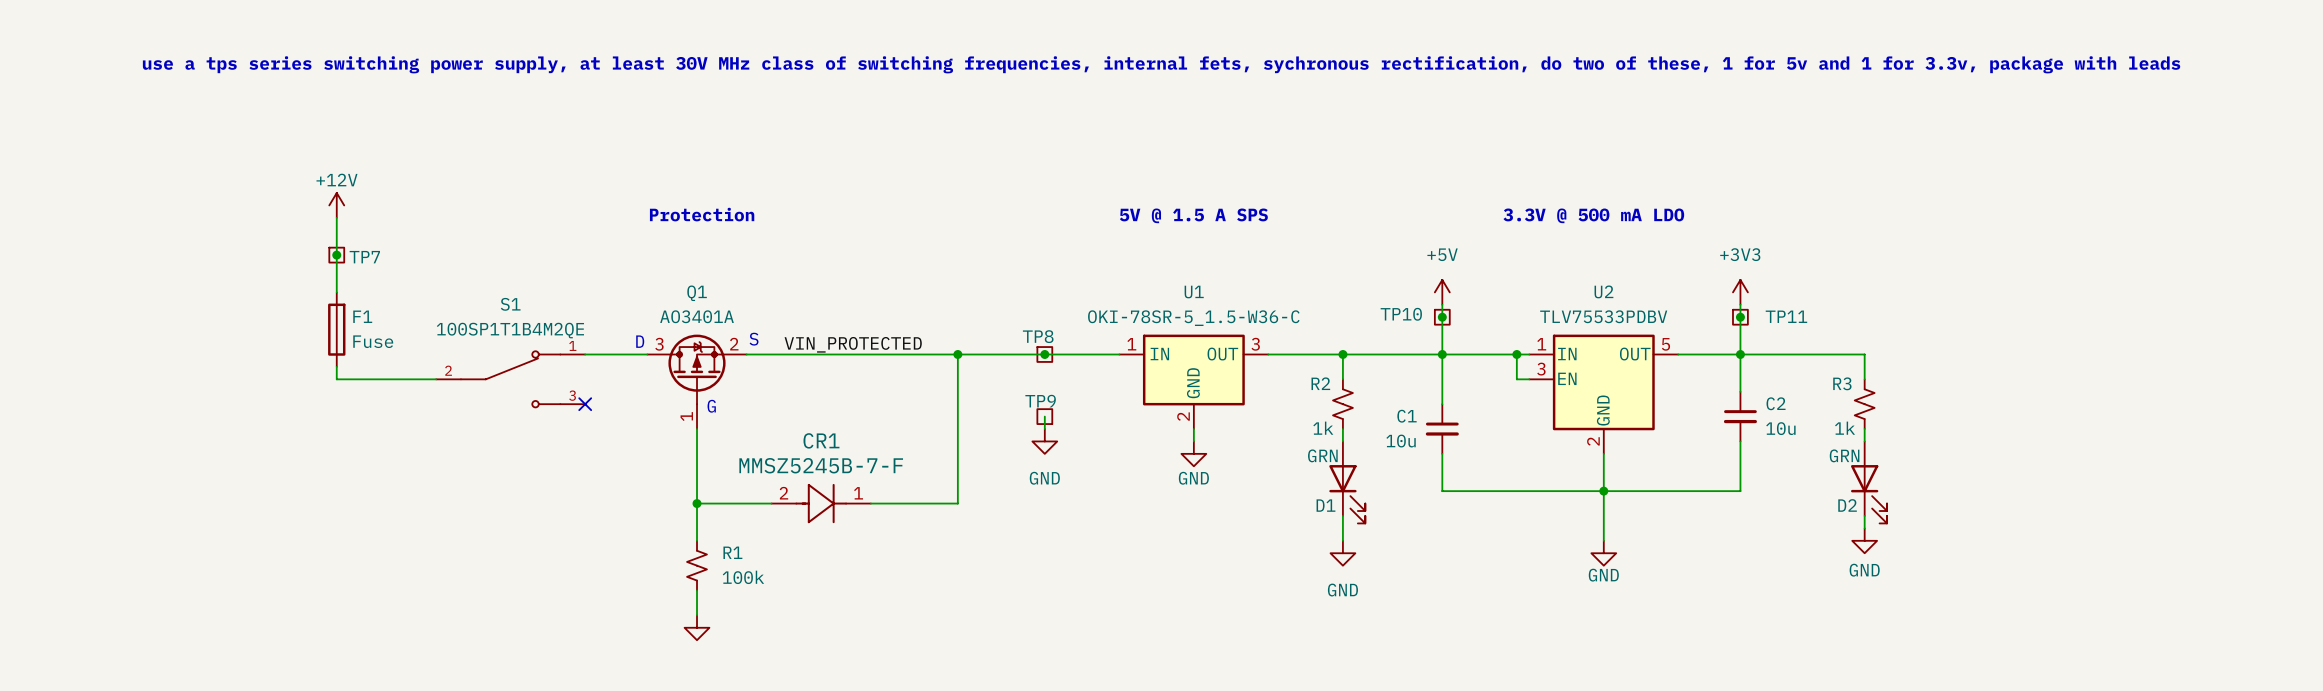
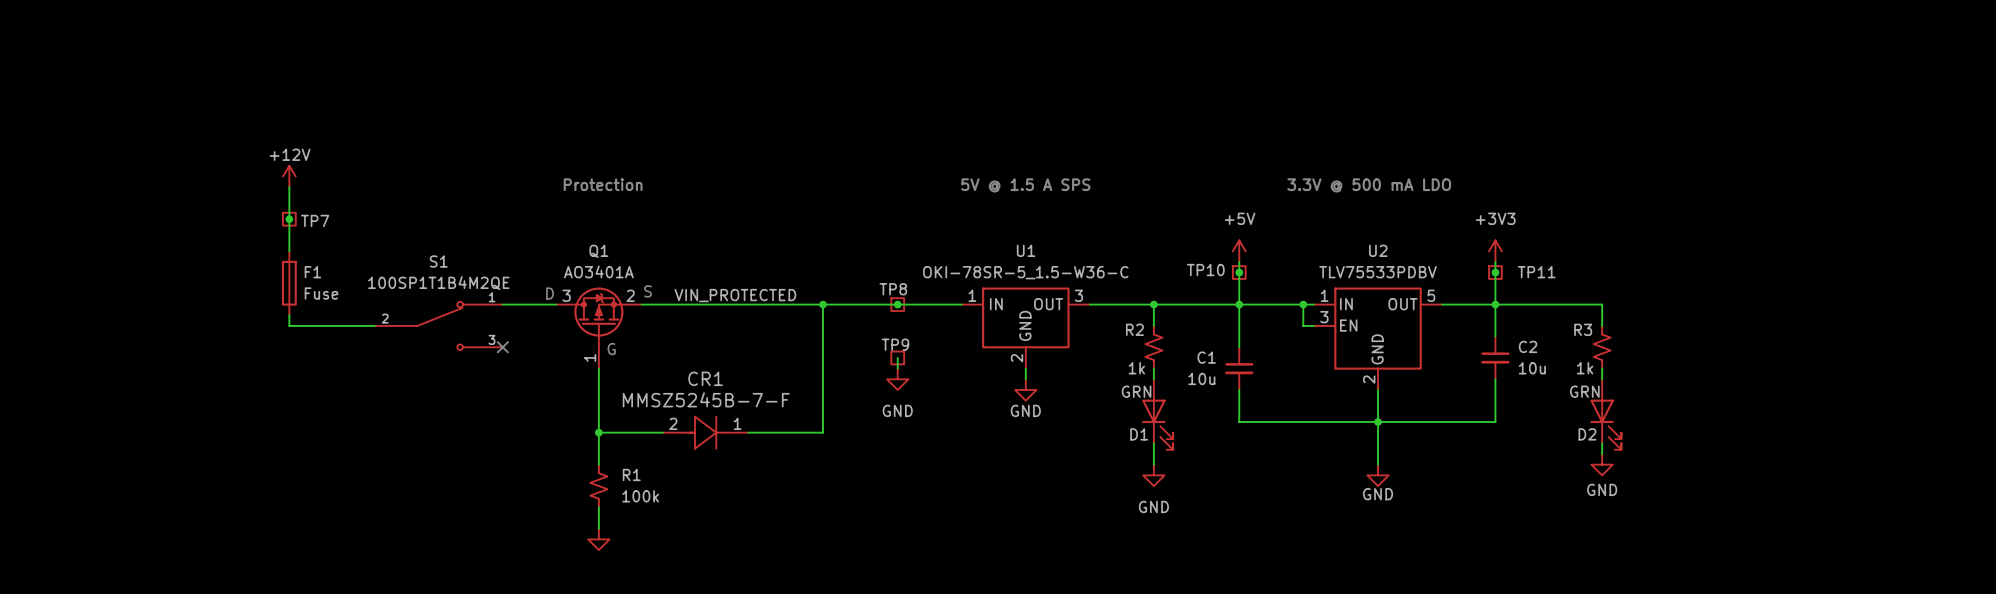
text: use a tps series switching power supply, at least 30V MHz class of switching frequencies, internal fets, sychronous rectification, do two of these, 1 for 5v and 1 for 3.3v, package with leads (1161, 64) -> none

